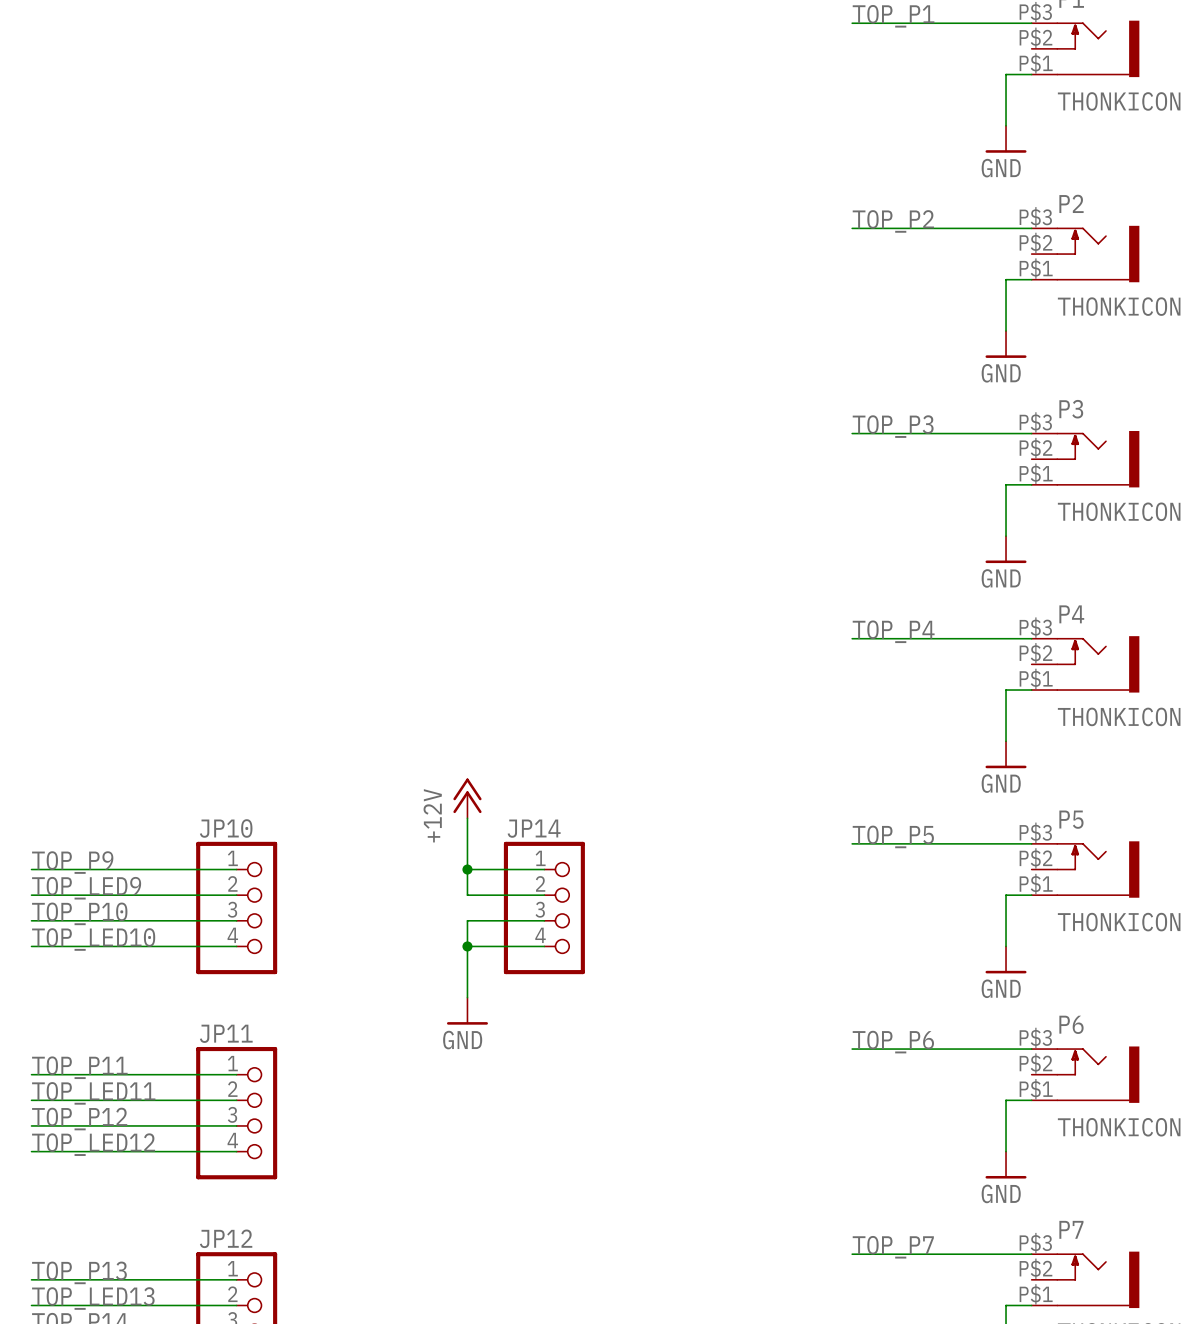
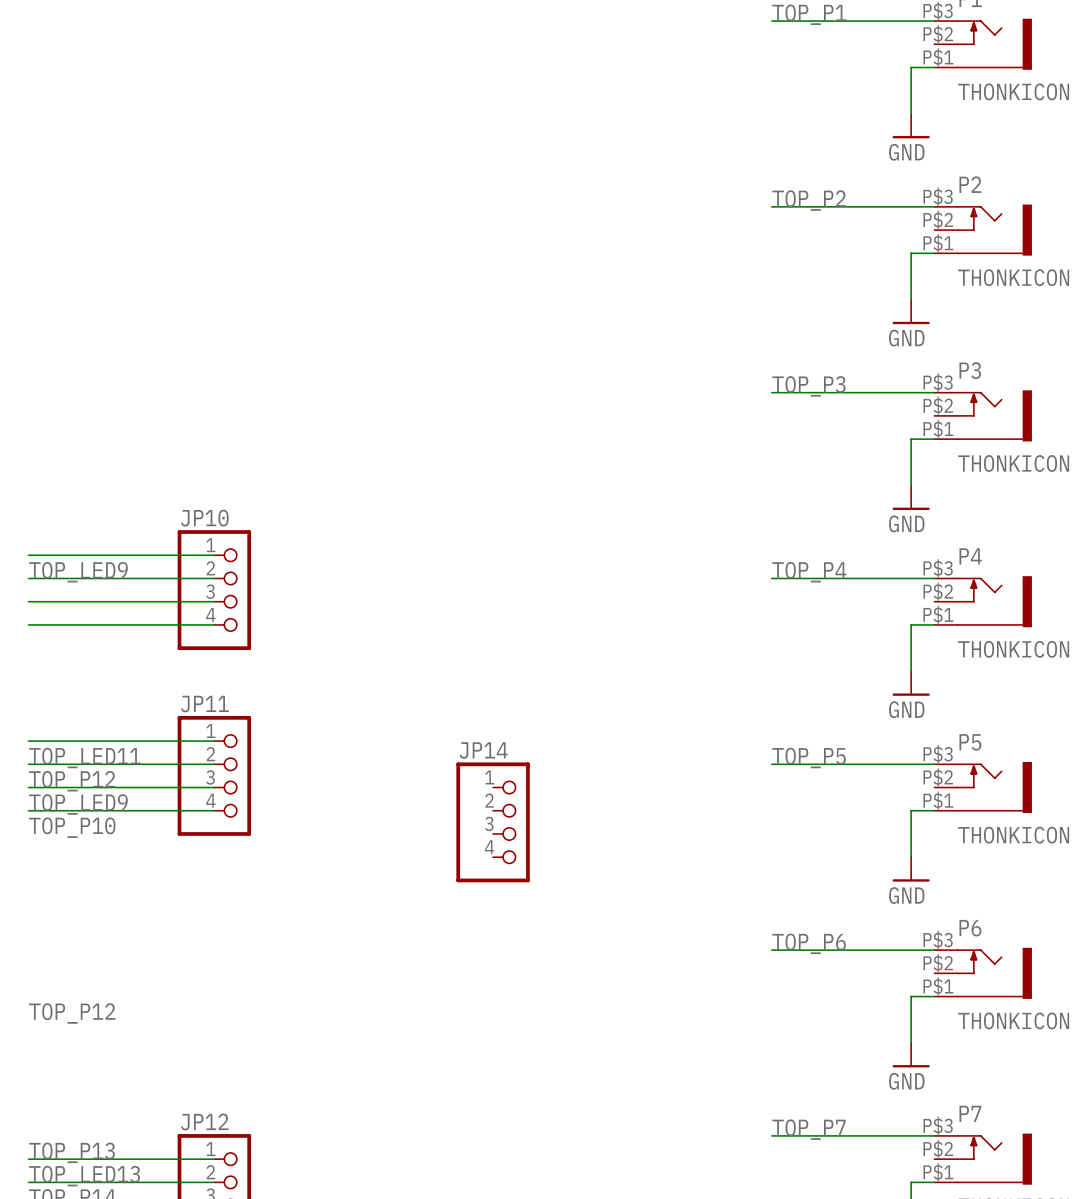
wire: none -> (28, 555) (214, 555)
label: none -> TOP_LED9 (78, 572)
wire: none -> (28, 578) (214, 578)
wire: none -> (28, 601) (214, 601)
wire: none -> (28, 624) (214, 624)
power symbol: +12V (467, 798) -> none
wire: (467, 818) (467, 895) (544, 895) -> none
label: none -> TOP_LED11 (84, 758)
label: TOP_P9 (72, 862) -> TOP_P12 (72, 781)
wire: (467, 869) (544, 869) -> none
junction: (467, 869) -> none
JP10 position: (236, 907) -> (214, 590)
wire: (31, 920) (236, 920) -> (28, 741) (214, 741)
wire: (544, 920) (467, 920) (467, 997) -> none
label: TOP_LED10 (93, 939) -> none
wire: (31, 946) (236, 946) -> (28, 764) (214, 764)
wire: (467, 946) (544, 946) -> none
junction: (467, 946) -> none
power symbol: GND (467, 1011) -> none
label: TOP_P11 (79, 1067) -> none
wire: (31, 1074) (236, 1074) -> none
label: TOP_LED11 (93, 1093) -> none
wire: (31, 1100) (236, 1100) -> none
JP11 position: (236, 1113) -> (214, 775)
wire: (31, 1125) (236, 1125) -> none
label: TOP_LED12 (93, 1144) -> none
wire: (31, 1151) (236, 1151) -> none

